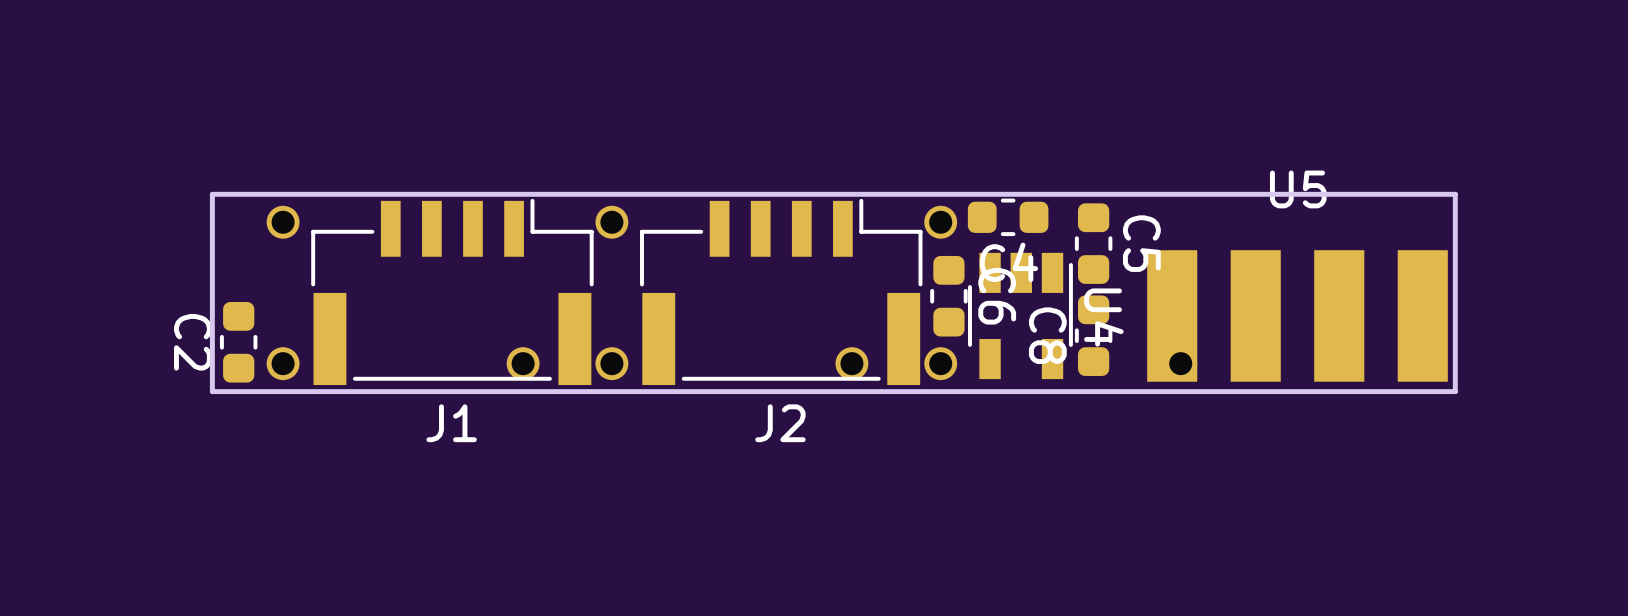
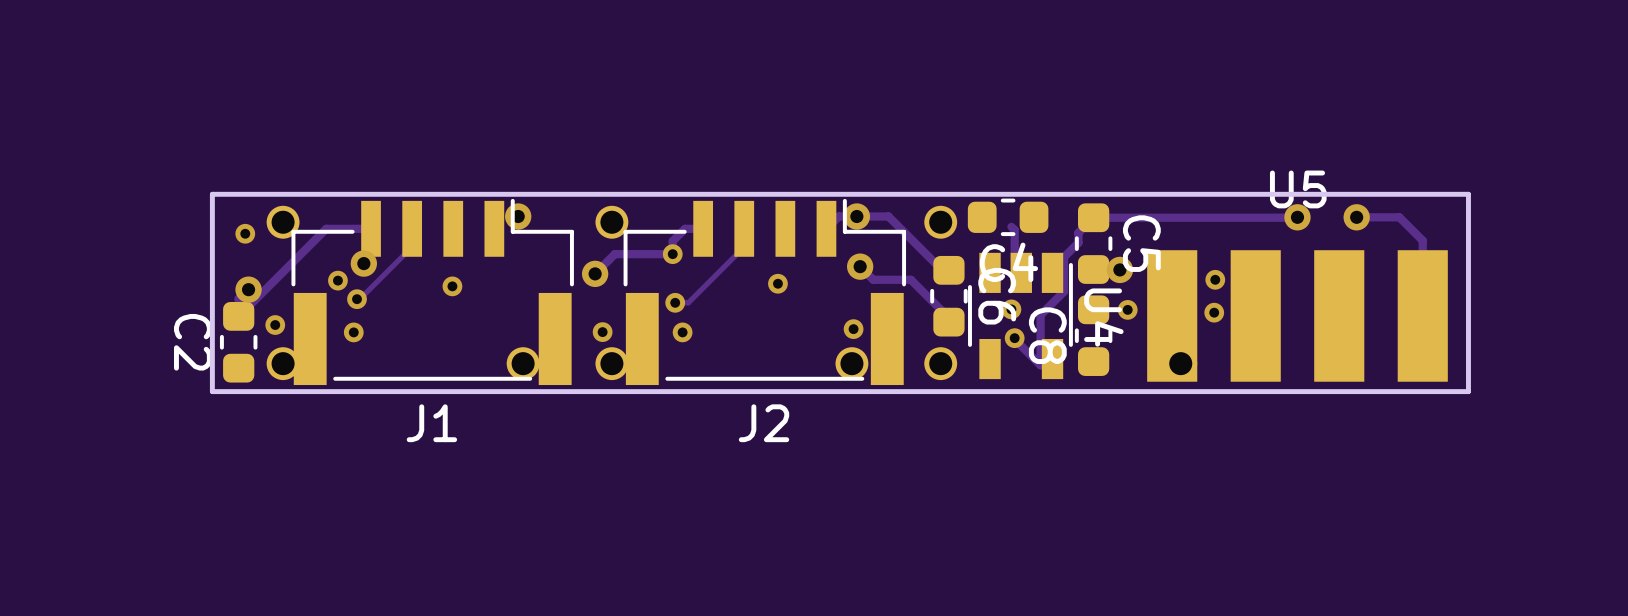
board edge: (1455, 194) (1455, 391) -> (1455, 194) (1468, 194) (1468, 391) (1455, 391)
via: none -> (518, 216)
via: none -> (856, 216)
track: none -> (1297, 217) (1093, 217) (1078, 232) (1078, 242) (1064, 257) (1064, 291) (1040, 315) (1040, 365) (1014, 338)
via: none -> (1297, 217)
track: none -> (1356, 217) (1399, 217) (1422, 240) (1422, 315)
via: none -> (1356, 217)
track: none -> (1011, 226) (1014, 230) (1014, 260)
track: none -> (412, 228) (412, 246) (359, 299) (357, 299)
track: none -> (703, 228) (685, 228) (672, 241) (672, 254) (614, 254) (595, 273)
track: none -> (744, 228) (744, 246) (688, 302) (675, 302)
track: none -> (826, 228) (838, 216) (888, 216) (945, 273)
via: none -> (245, 233)
via: none -> (672, 254)
track: none -> (363, 263) (371, 256) (371, 228) (326, 228) (238, 316) (238, 298) (248, 289)
via: none -> (363, 263)
track: none -> (860, 266) (873, 279) (910, 279) (942, 311) (942, 322)
via: none -> (860, 266)
via: none -> (1119, 269)
via: none -> (595, 273)
via: none -> (1215, 279)
via: none -> (337, 280)
via: none -> (777, 283)
via: none -> (452, 286)
via: none -> (248, 289)
J1 position: (452, 291) -> (432, 291)
J2 position: (781, 291) -> (764, 291)
via: none -> (357, 299)
via: none -> (675, 302)
via: none -> (1011, 309)
via: none -> (1127, 309)
via: none -> (1214, 312)
via: none -> (275, 325)
via: none -> (853, 329)
via: none -> (353, 332)
via: none -> (602, 332)
via: none -> (682, 332)
via: none -> (1014, 338)

